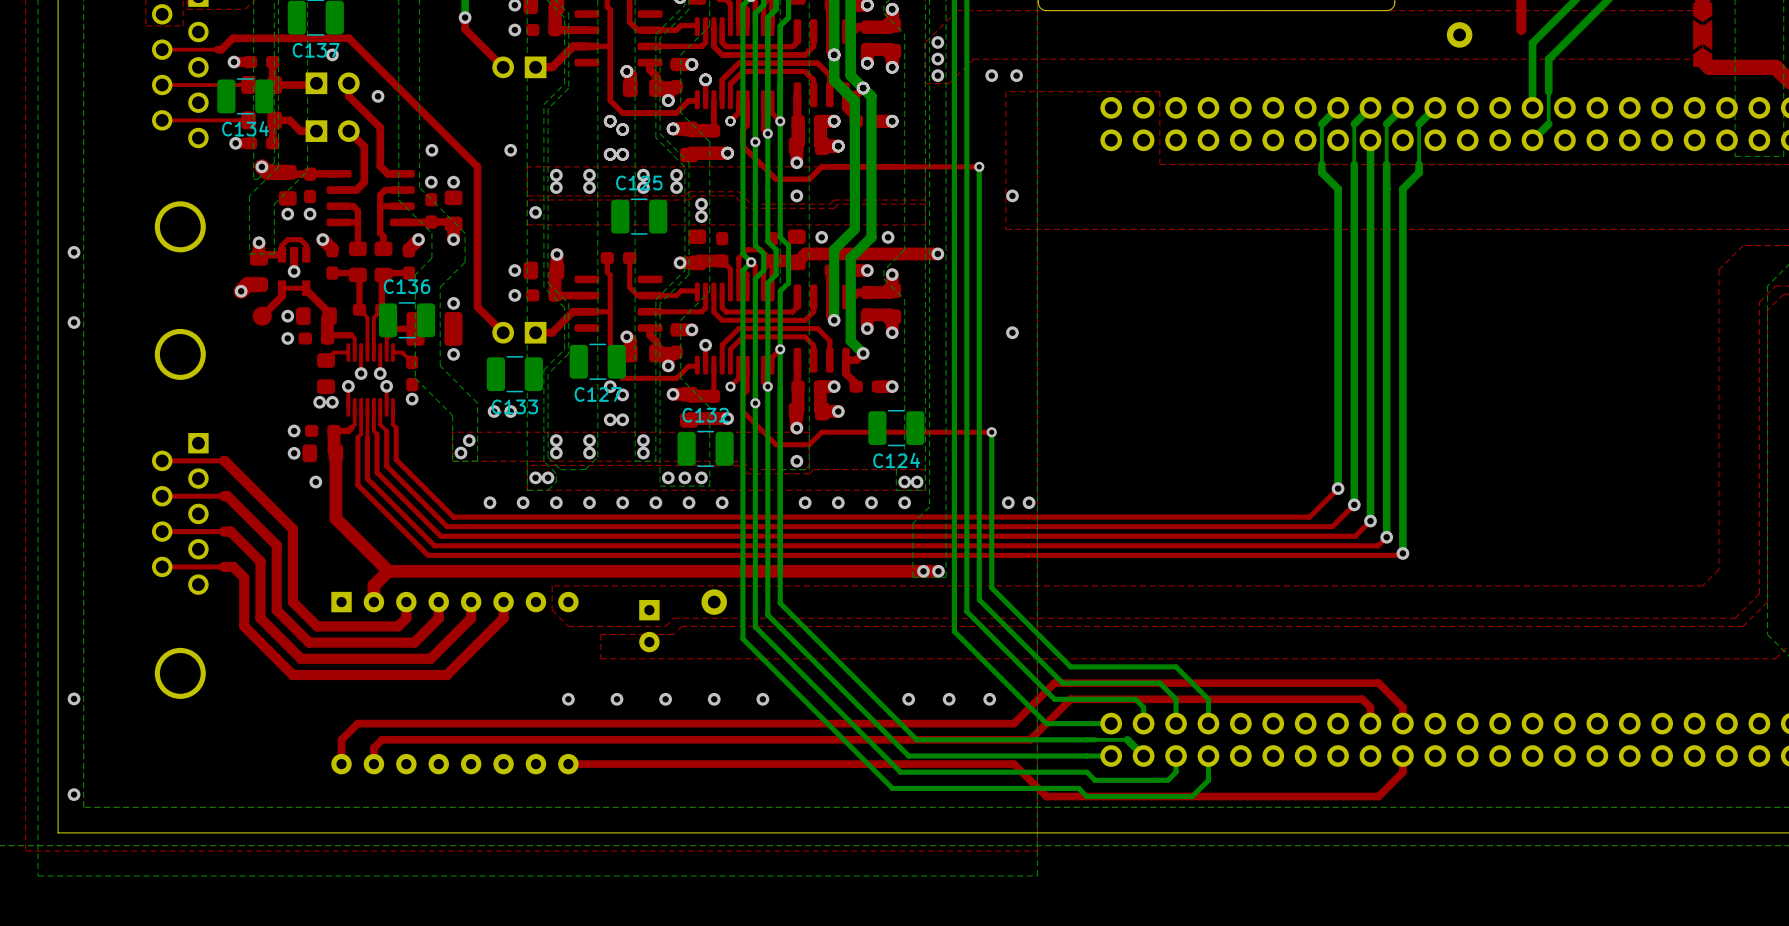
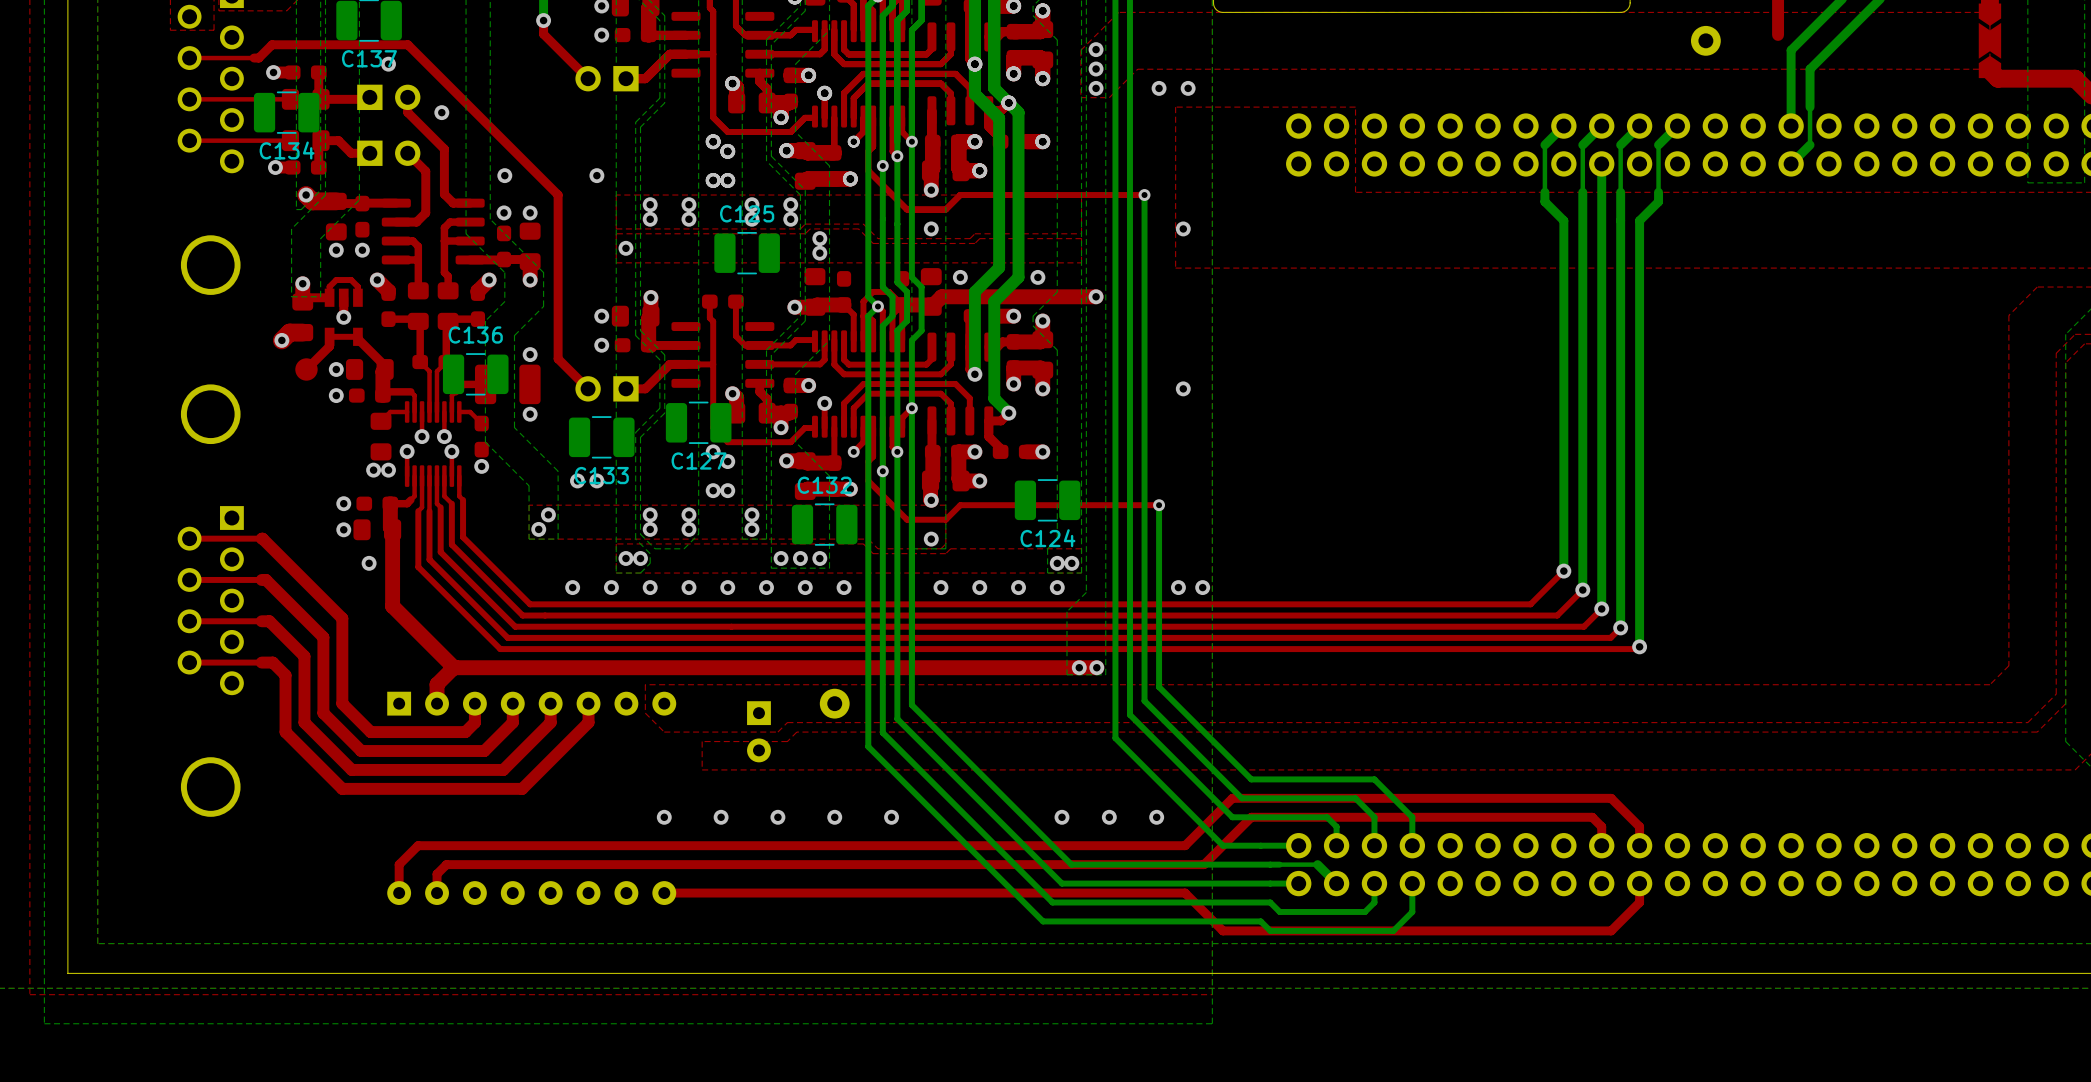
via: (74, 252) -> none
via: (74, 322) -> none
via: (74, 698) -> none
via: (74, 794) -> none

